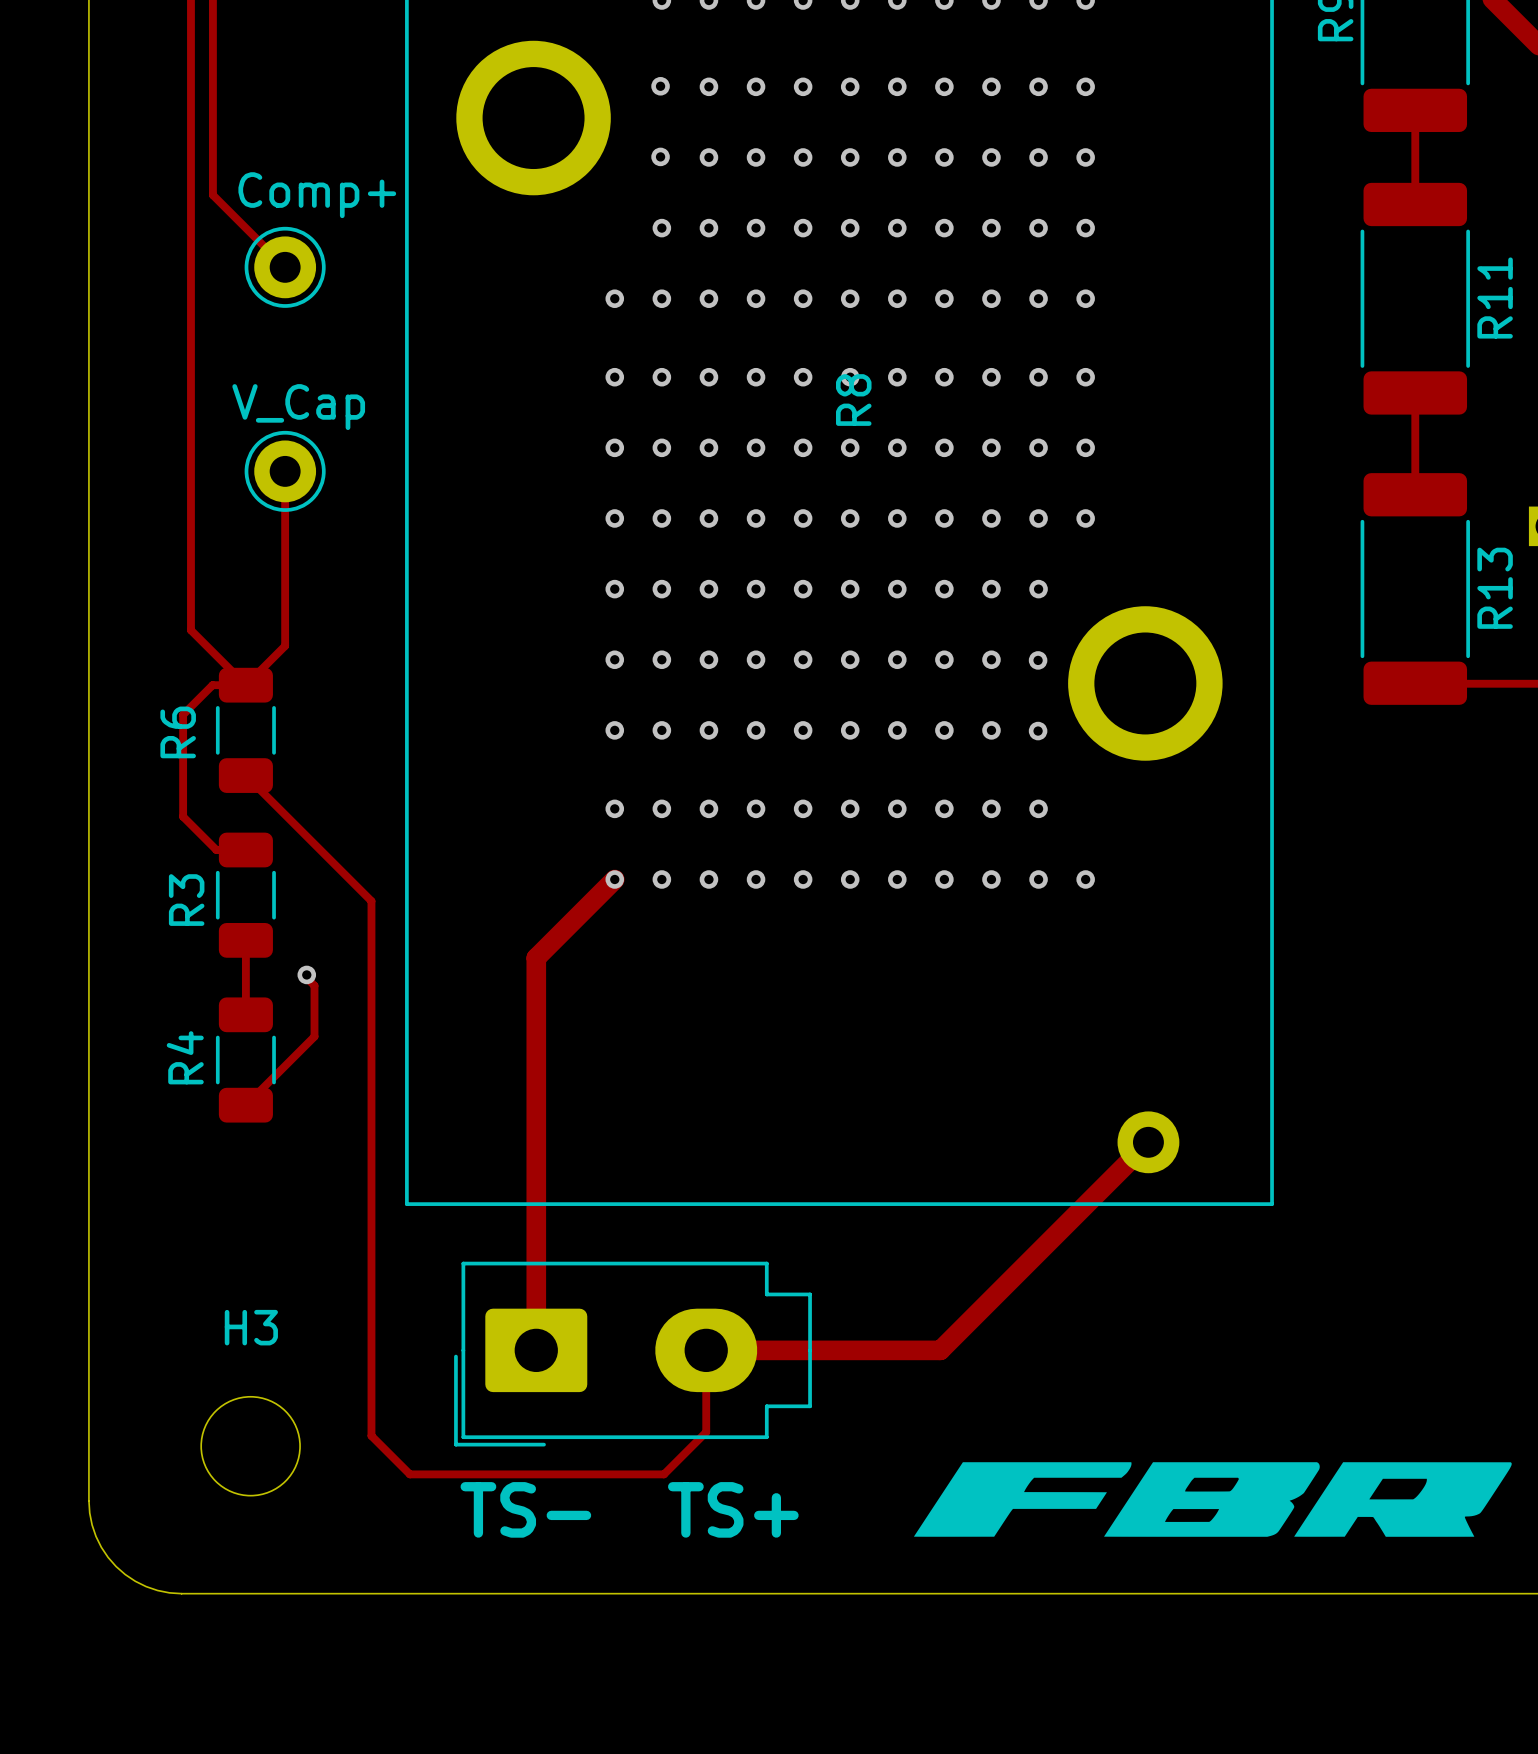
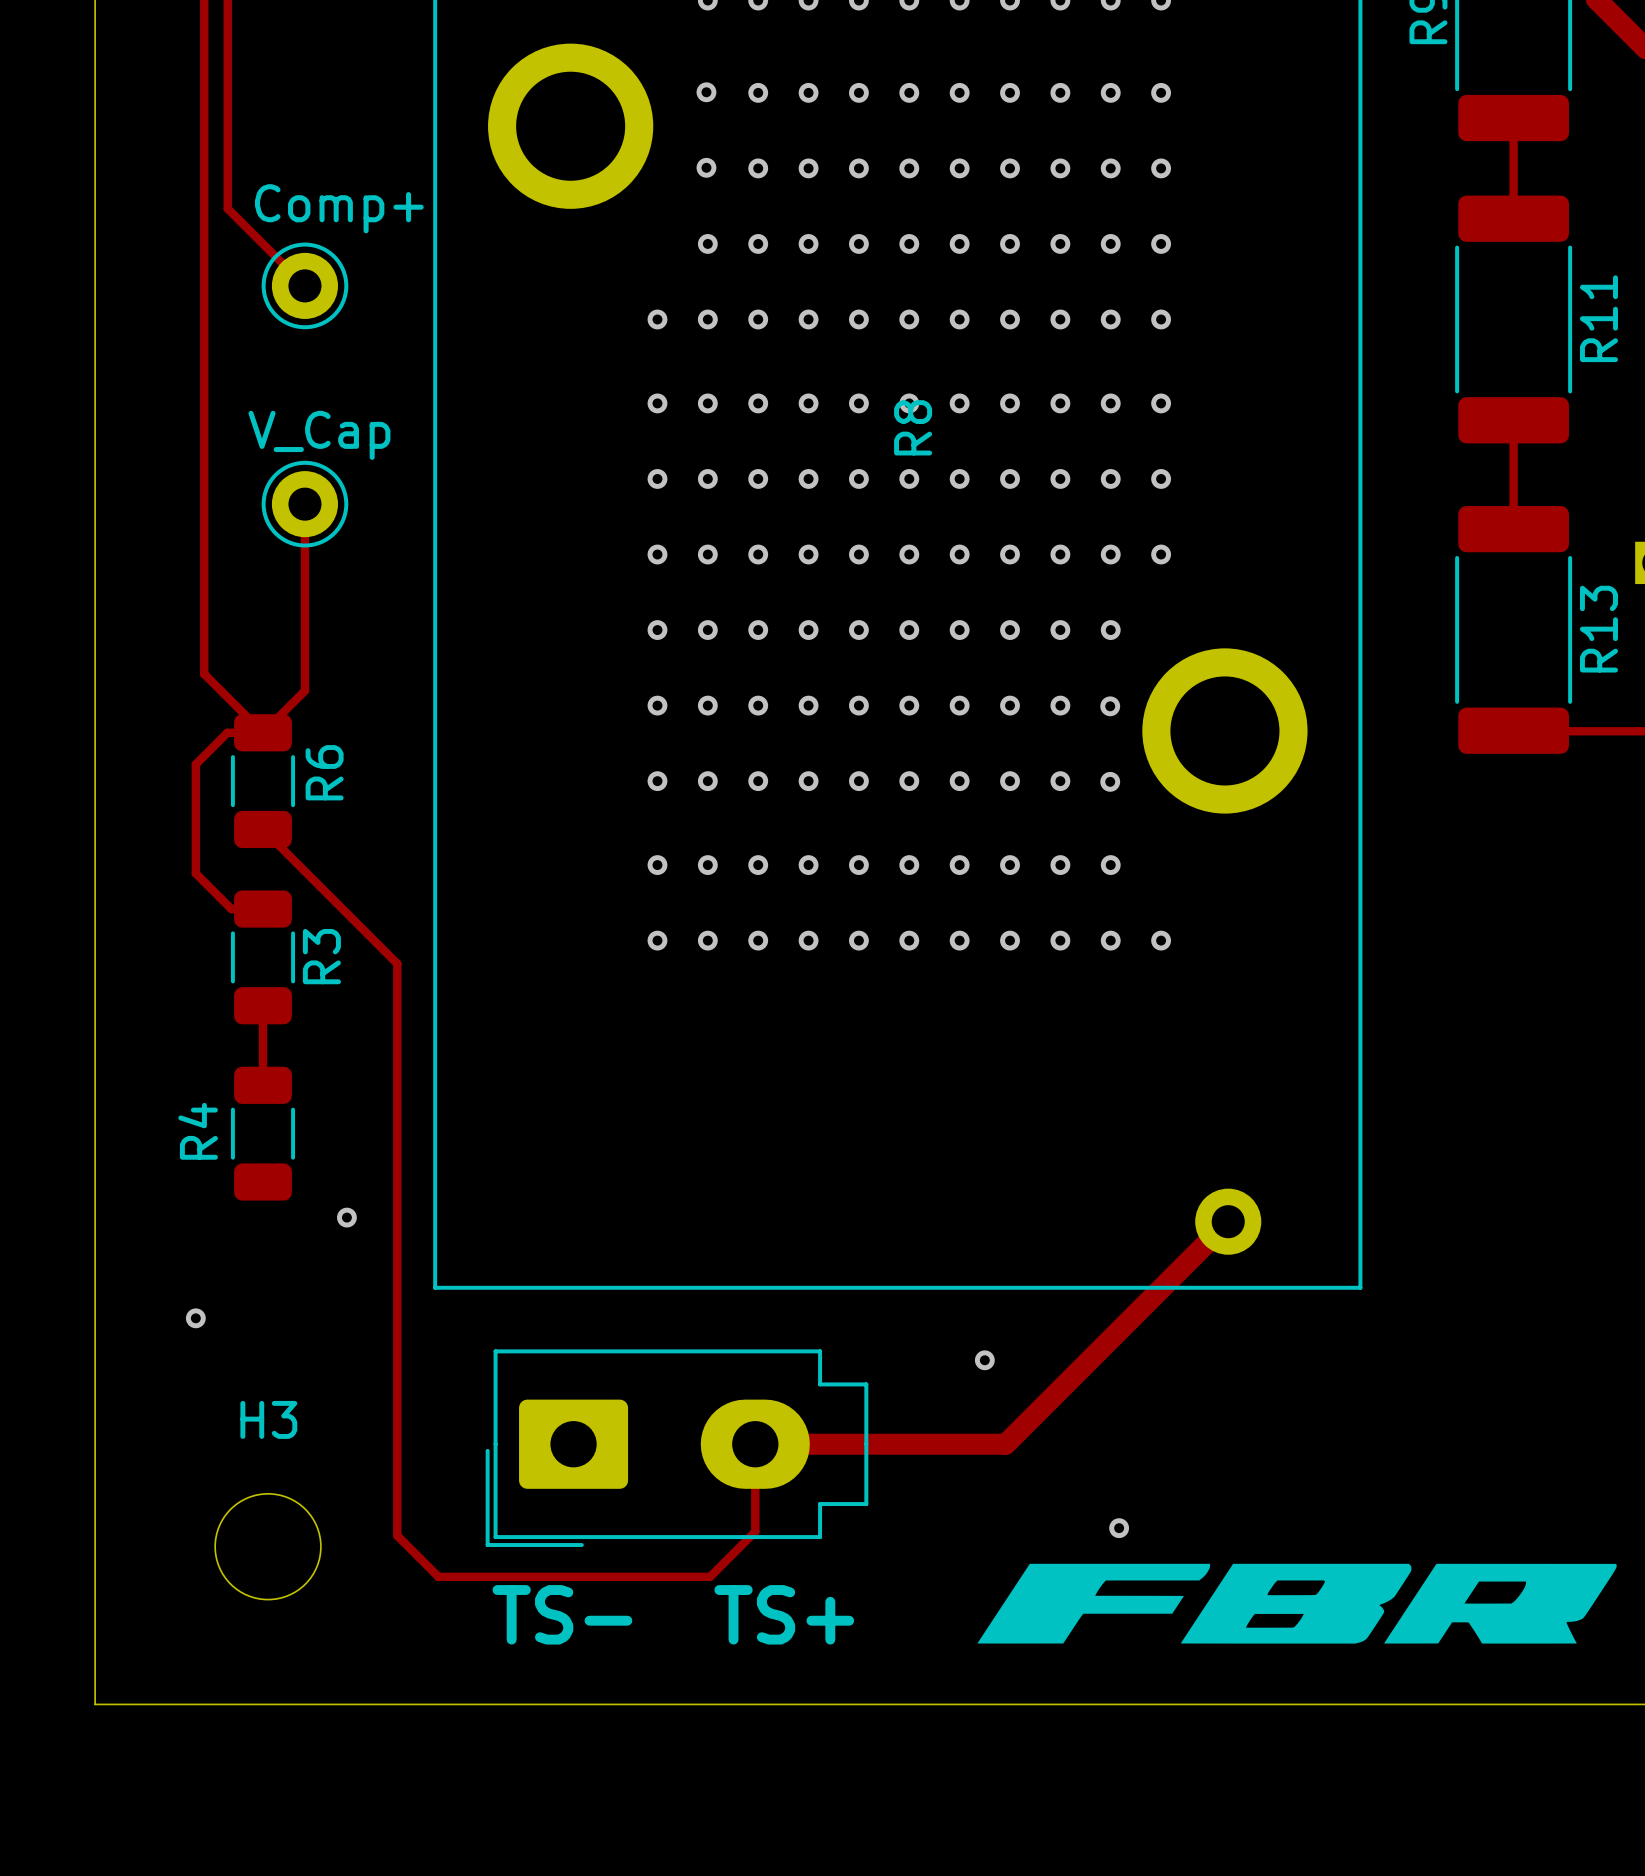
R6 name position: R6 (178, 732) -> R6 (324, 772)
track: (614, 879) (536, 957) (536, 1350) -> none
R3 name position: R3 (186, 900) -> R3 (321, 956)
track: (302, 974) (306, 974) (306, 978) (314, 985) (314, 1036) (245, 1105) -> none
via: (306, 974) -> none
via: none -> (346, 1217)
via: none -> (195, 1318)
via: none -> (984, 1360)
via: none -> (1119, 1528)
board edge: (88, 1500) (89, 1513) (96, 1536) (108, 1557) (116, 1566) (135, 1581) (146, 1586) (157, 1590) (181, 1593) -> (95, 1605) (95, 1704) (194, 1704)

